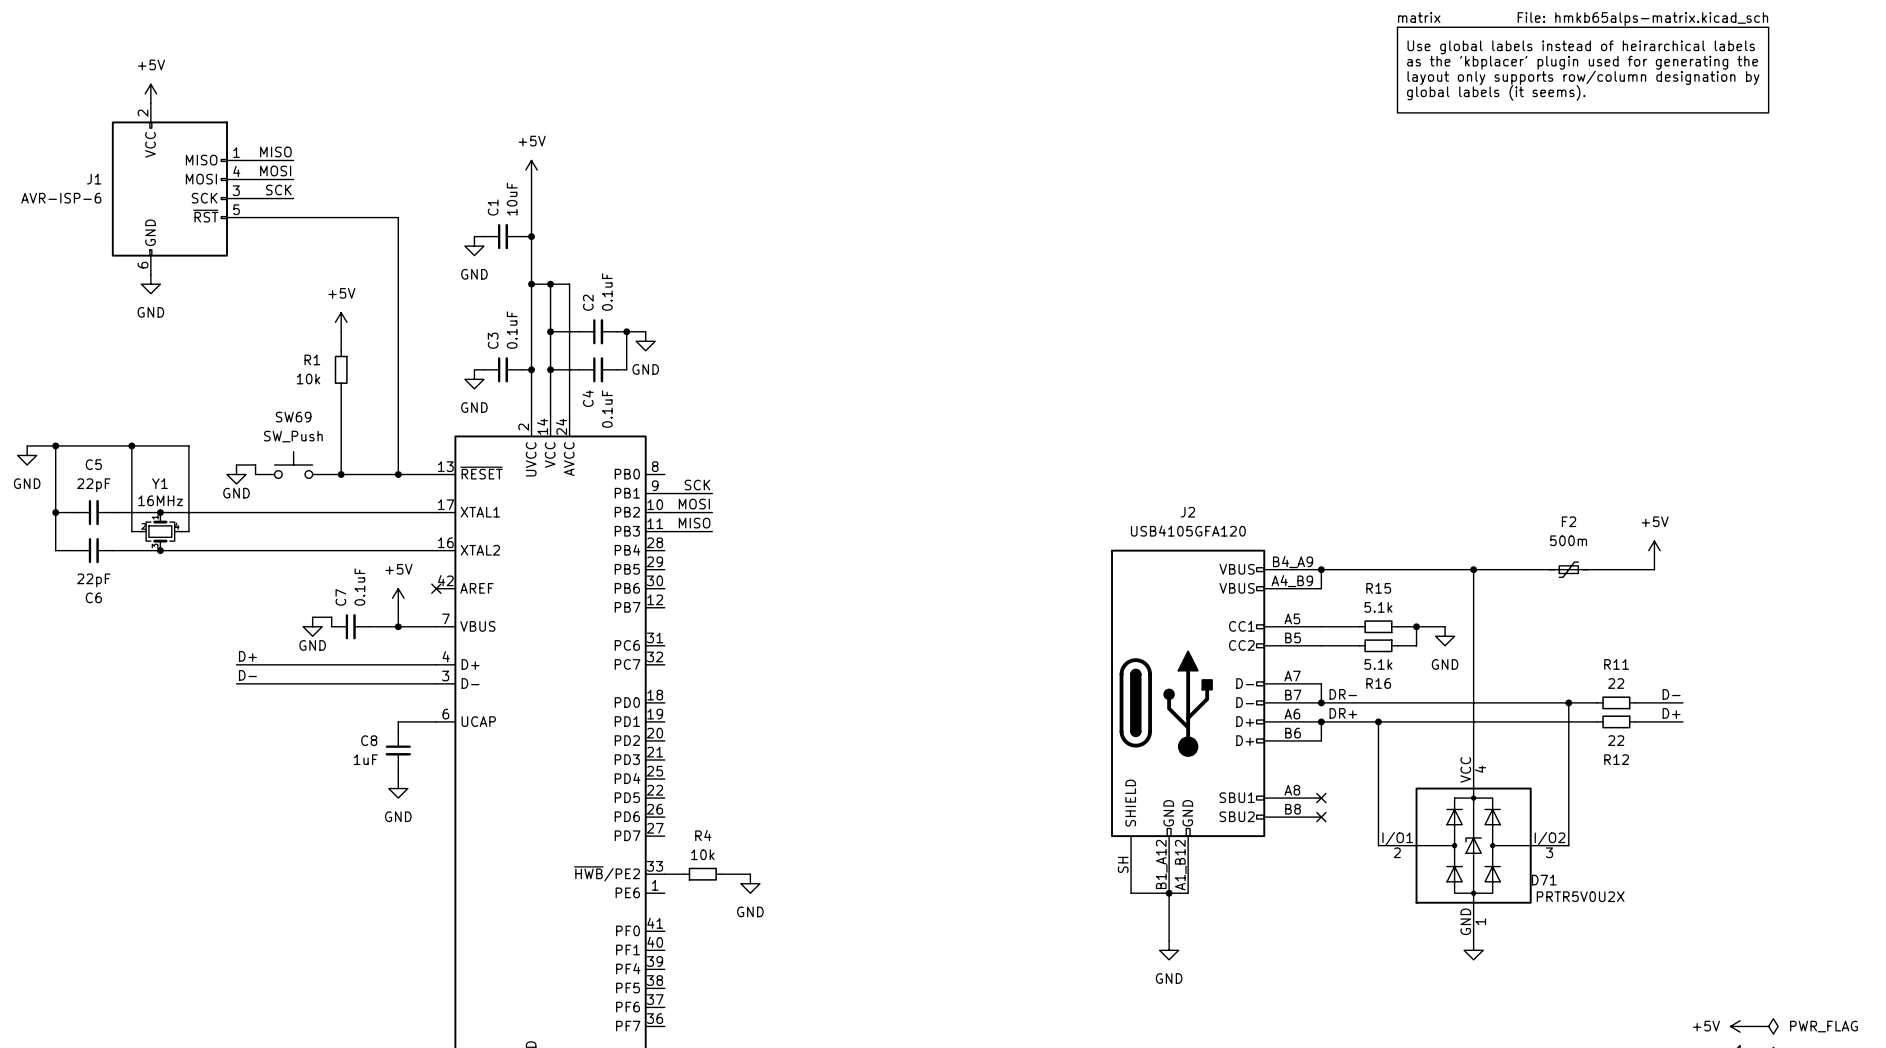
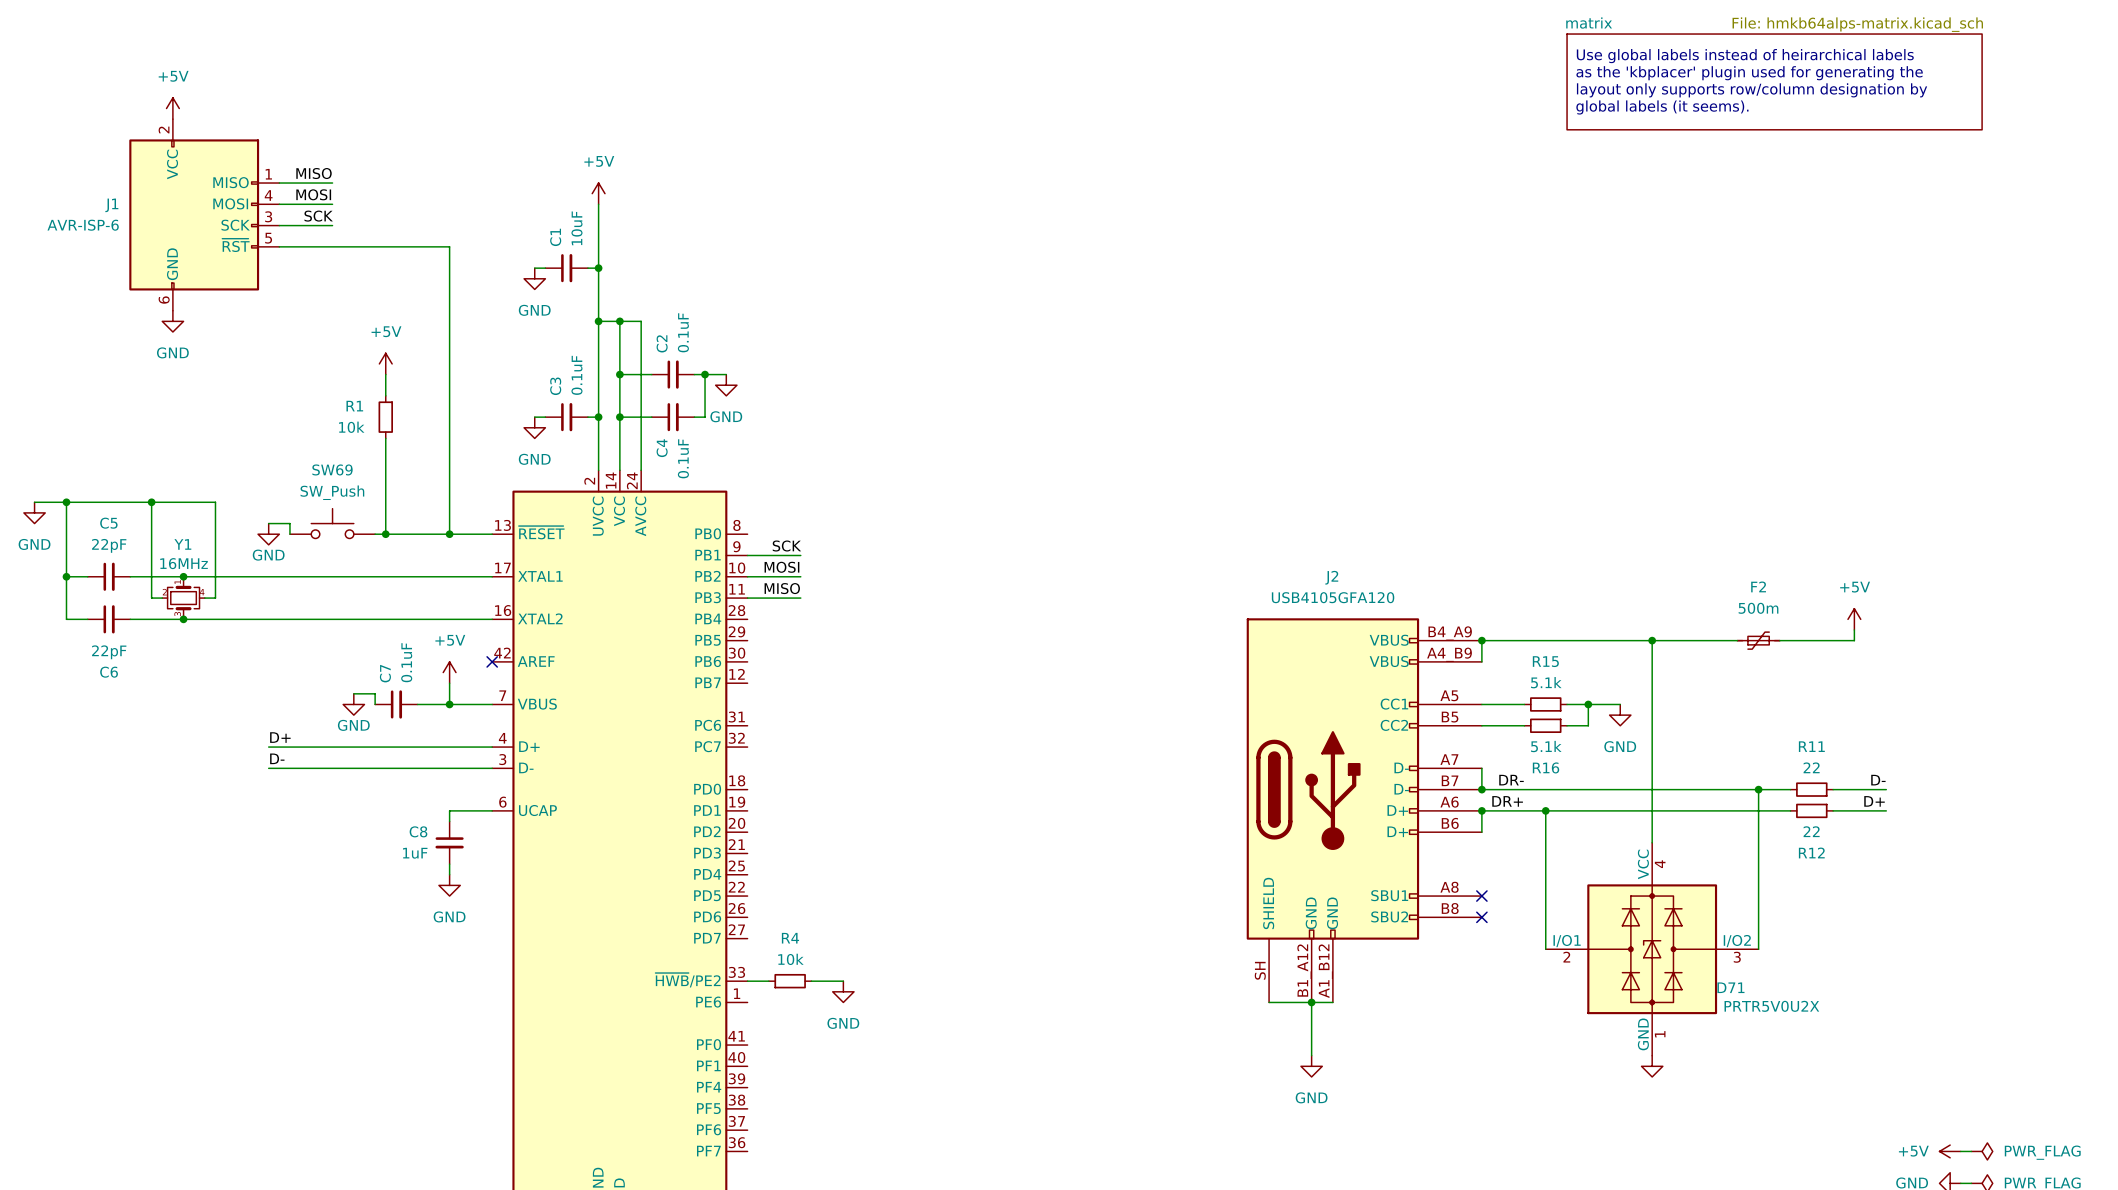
sheet matrix value: File: hmkb65alps-matrix.kicad_sch (1642, 19) -> File: hmkb64alps-matrix.kicad_sch (1857, 24)

